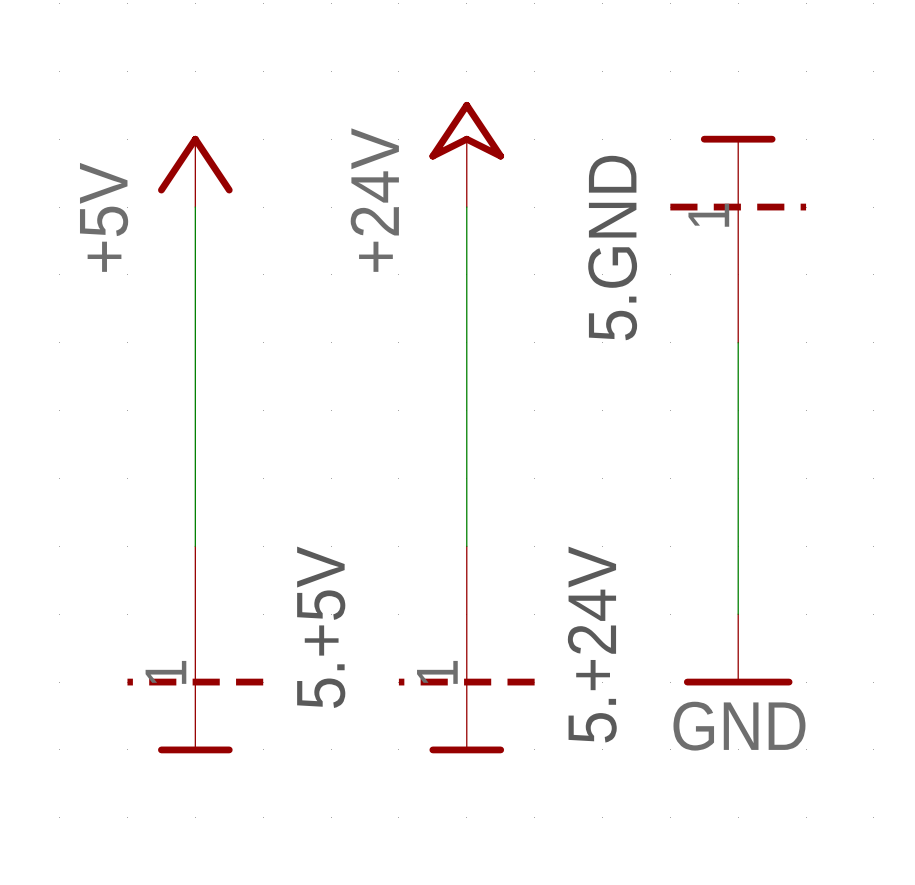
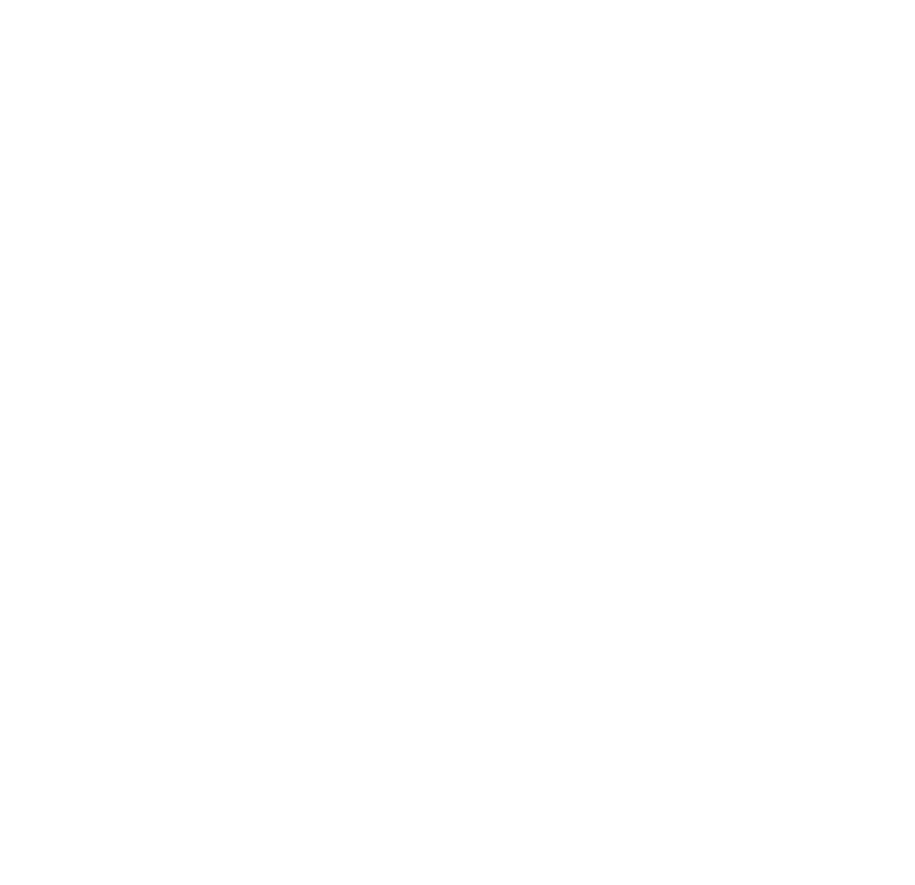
power symbol: +24V (466, 154) -> none
power symbol: +5V (195, 171) -> none
wire: (195, 207) (195, 546) -> none
wire: (466, 207) (466, 546) -> none
5.GND: (738, 239) -> none
wire: (738, 342) (738, 614) -> none
5.+5V: (195, 649) -> none
5.+24V: (466, 649) -> none
power symbol: GND (738, 649) -> none

